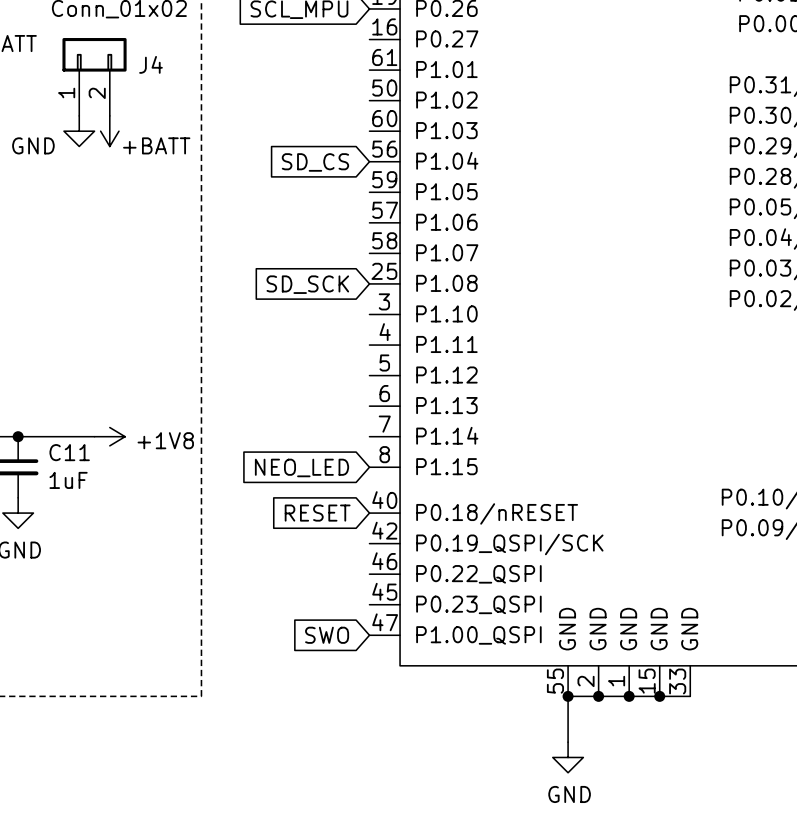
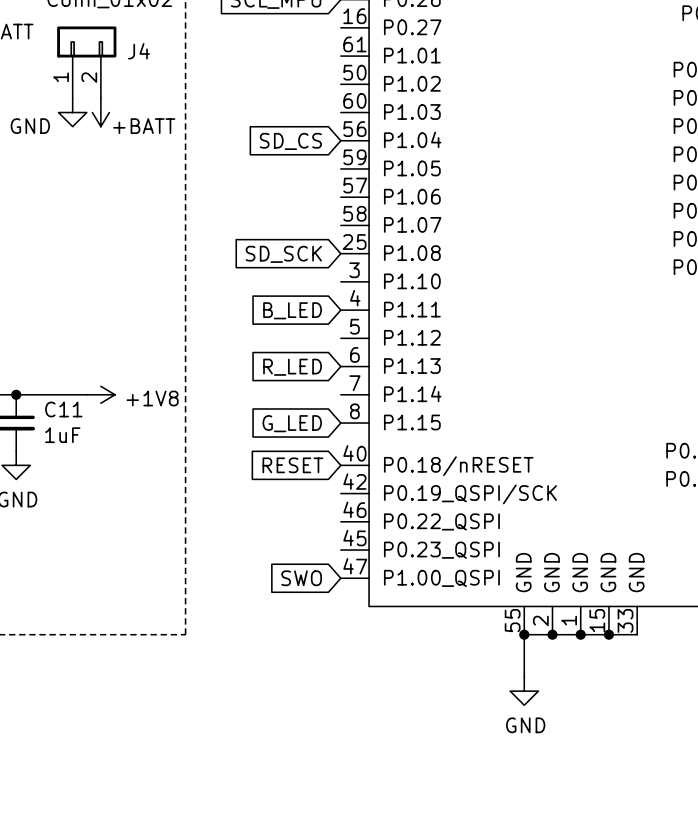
global label: none -> B_LED (292, 310)
global label: none -> R_LED (292, 367)
global label: NEO_LED (302, 467) -> G_LED (292, 423)

